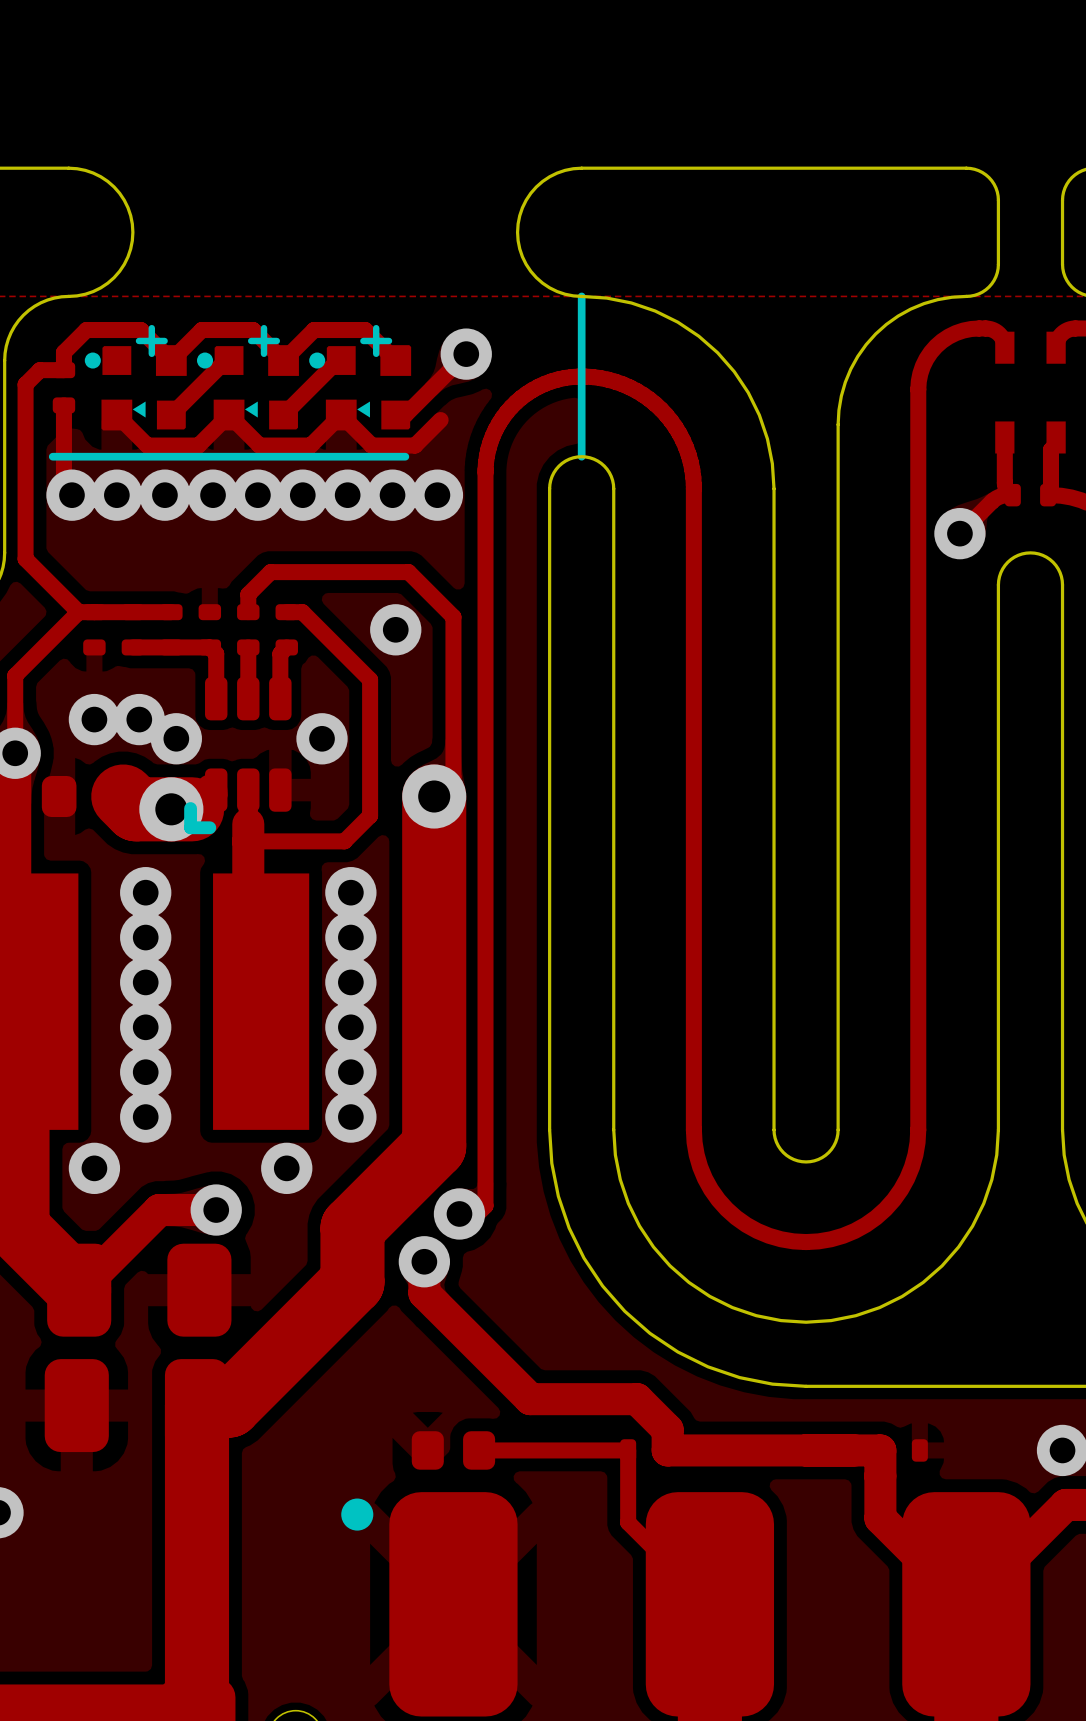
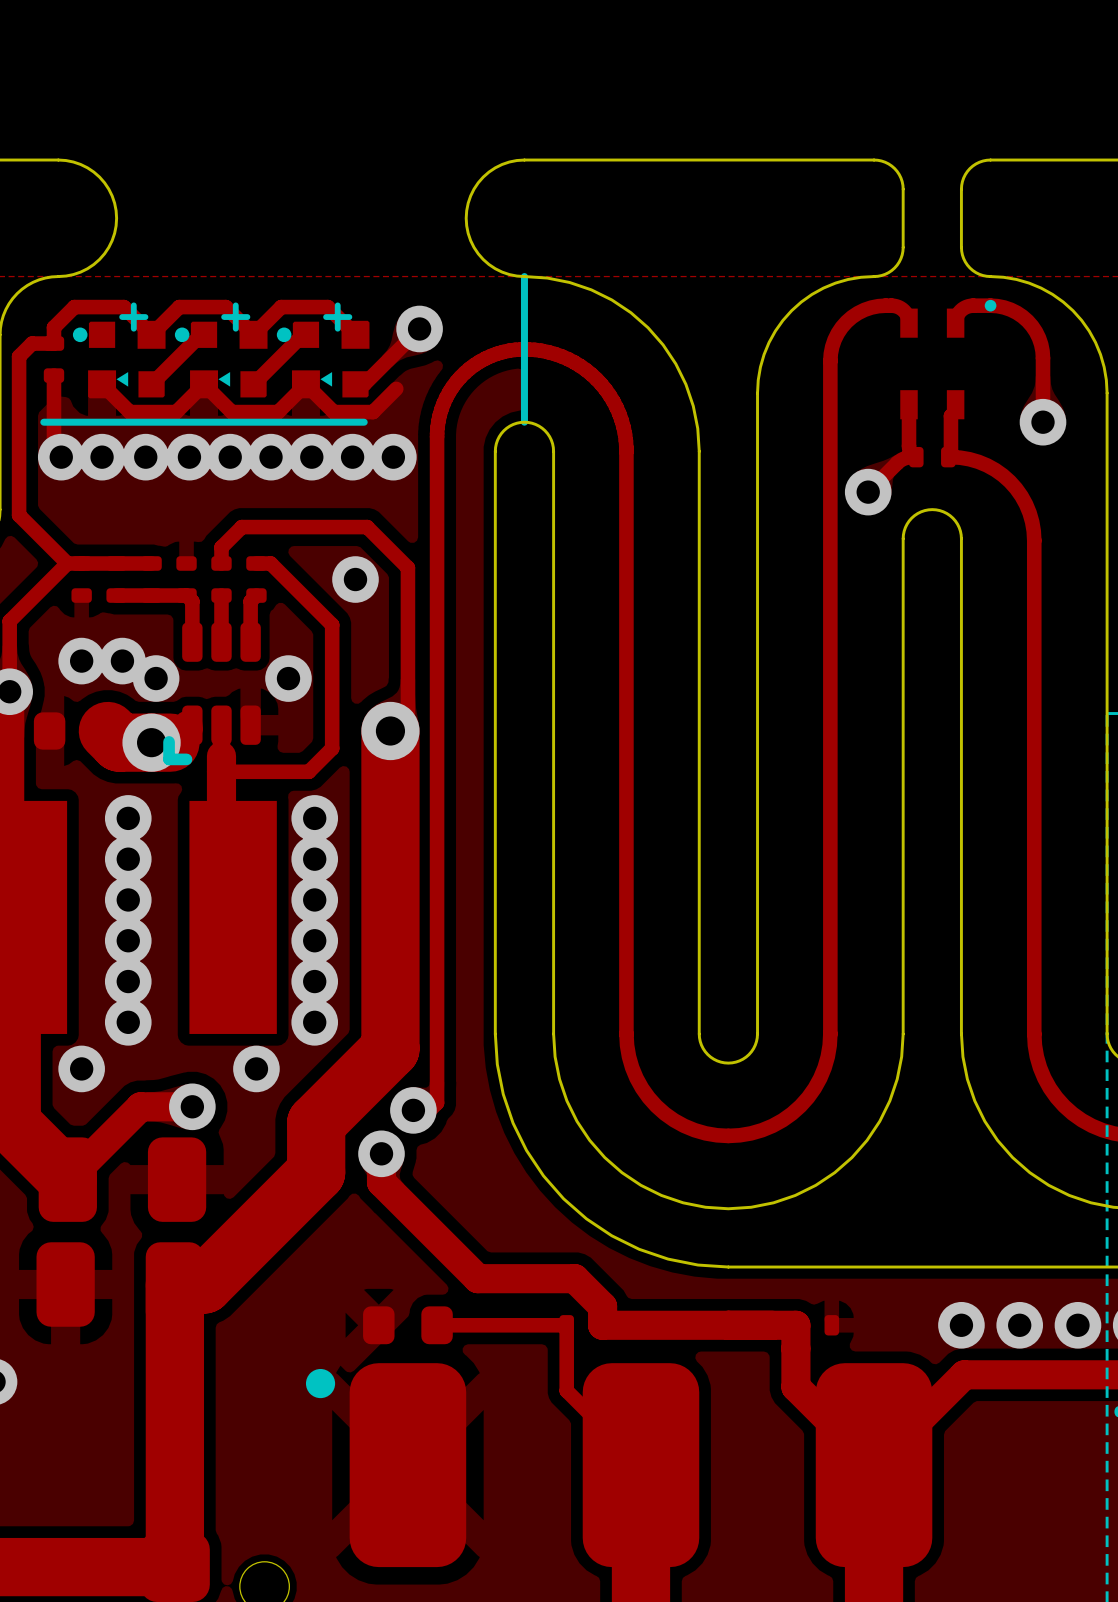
part footprint: [411, 1431, 496, 1470] -> [363, 1306, 453, 1345]

